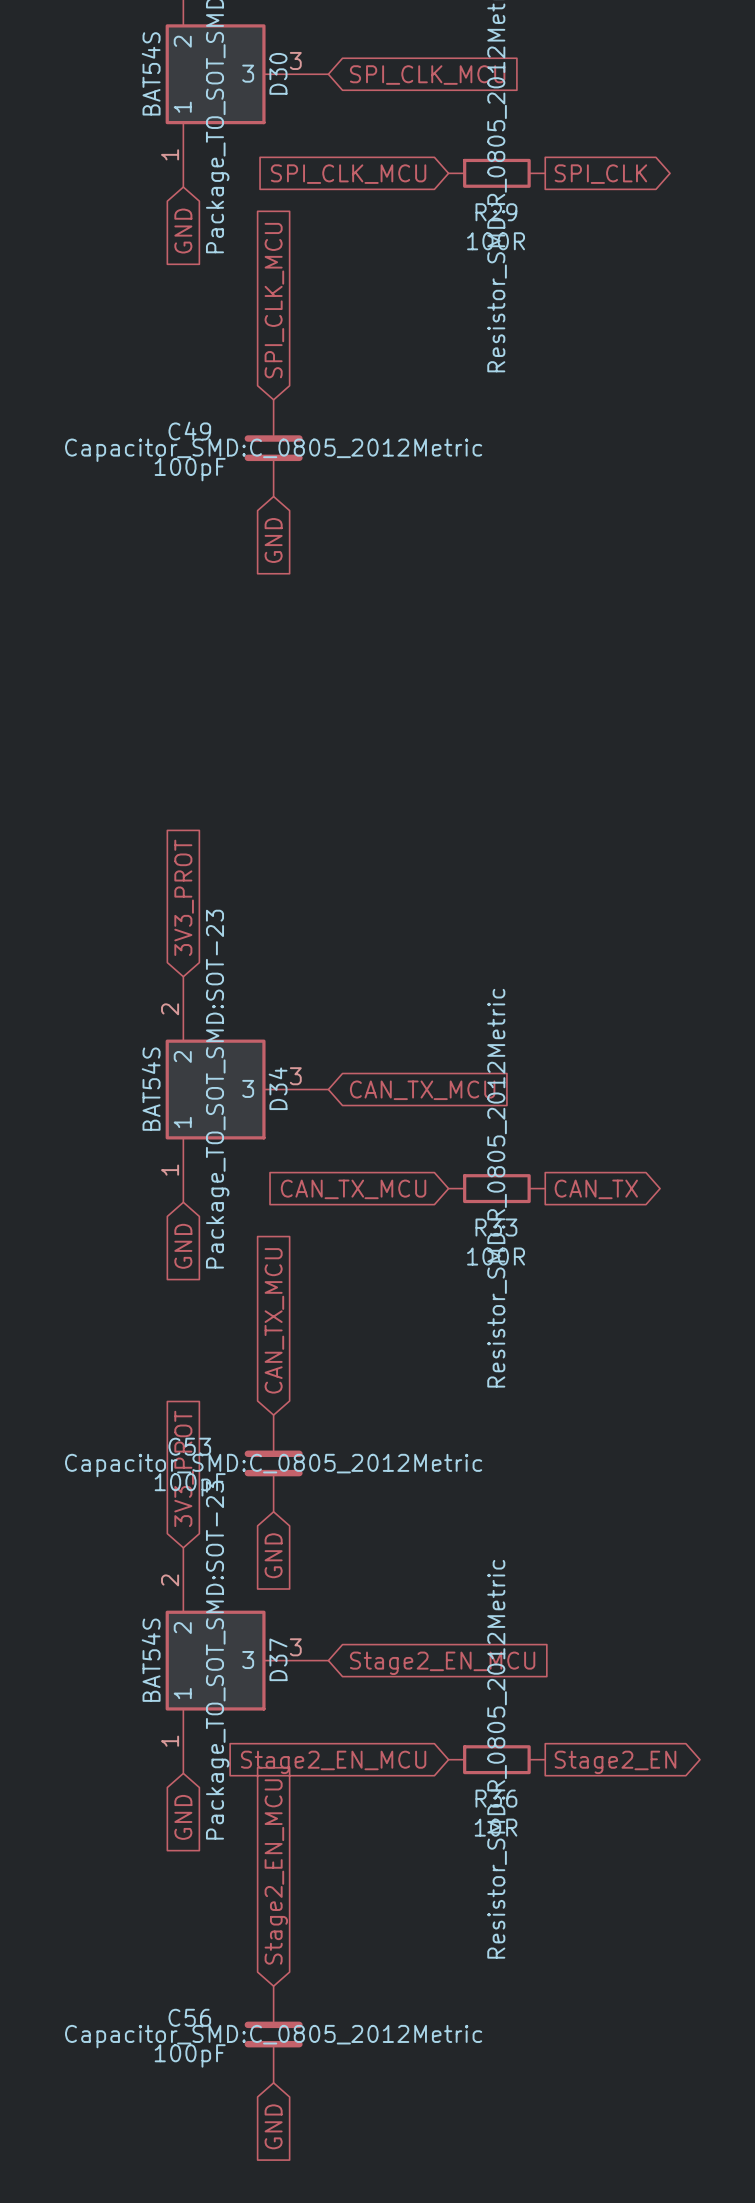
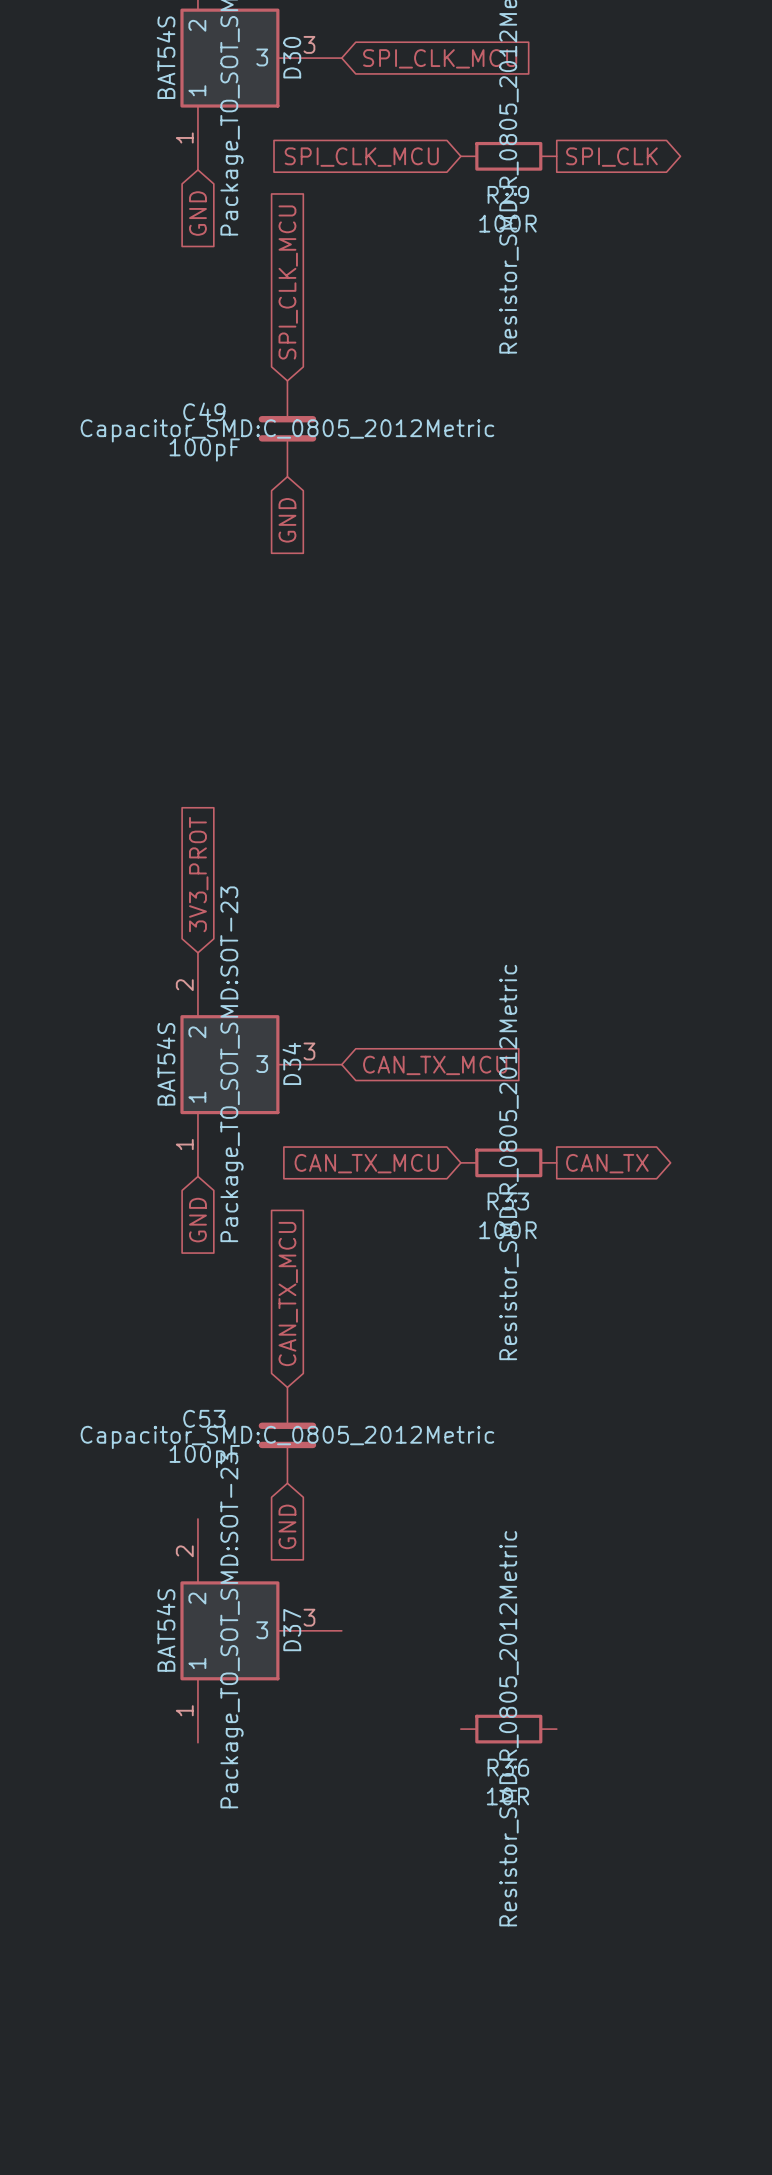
global label: 3V3_PROT (184, 1468) -> none
global label: Stage2_EN_MCU (442, 1663) -> none
global label: Stage2_EN_MCU (333, 1762) -> none
global label: Stage2_EN (615, 1762) -> none
global label: GND (183, 1817) -> none
global label: Stage2_EN_MCU (276, 1871) -> none
C56: 100pF (273, 2034) -> none
global label: GND (273, 2126) -> none

